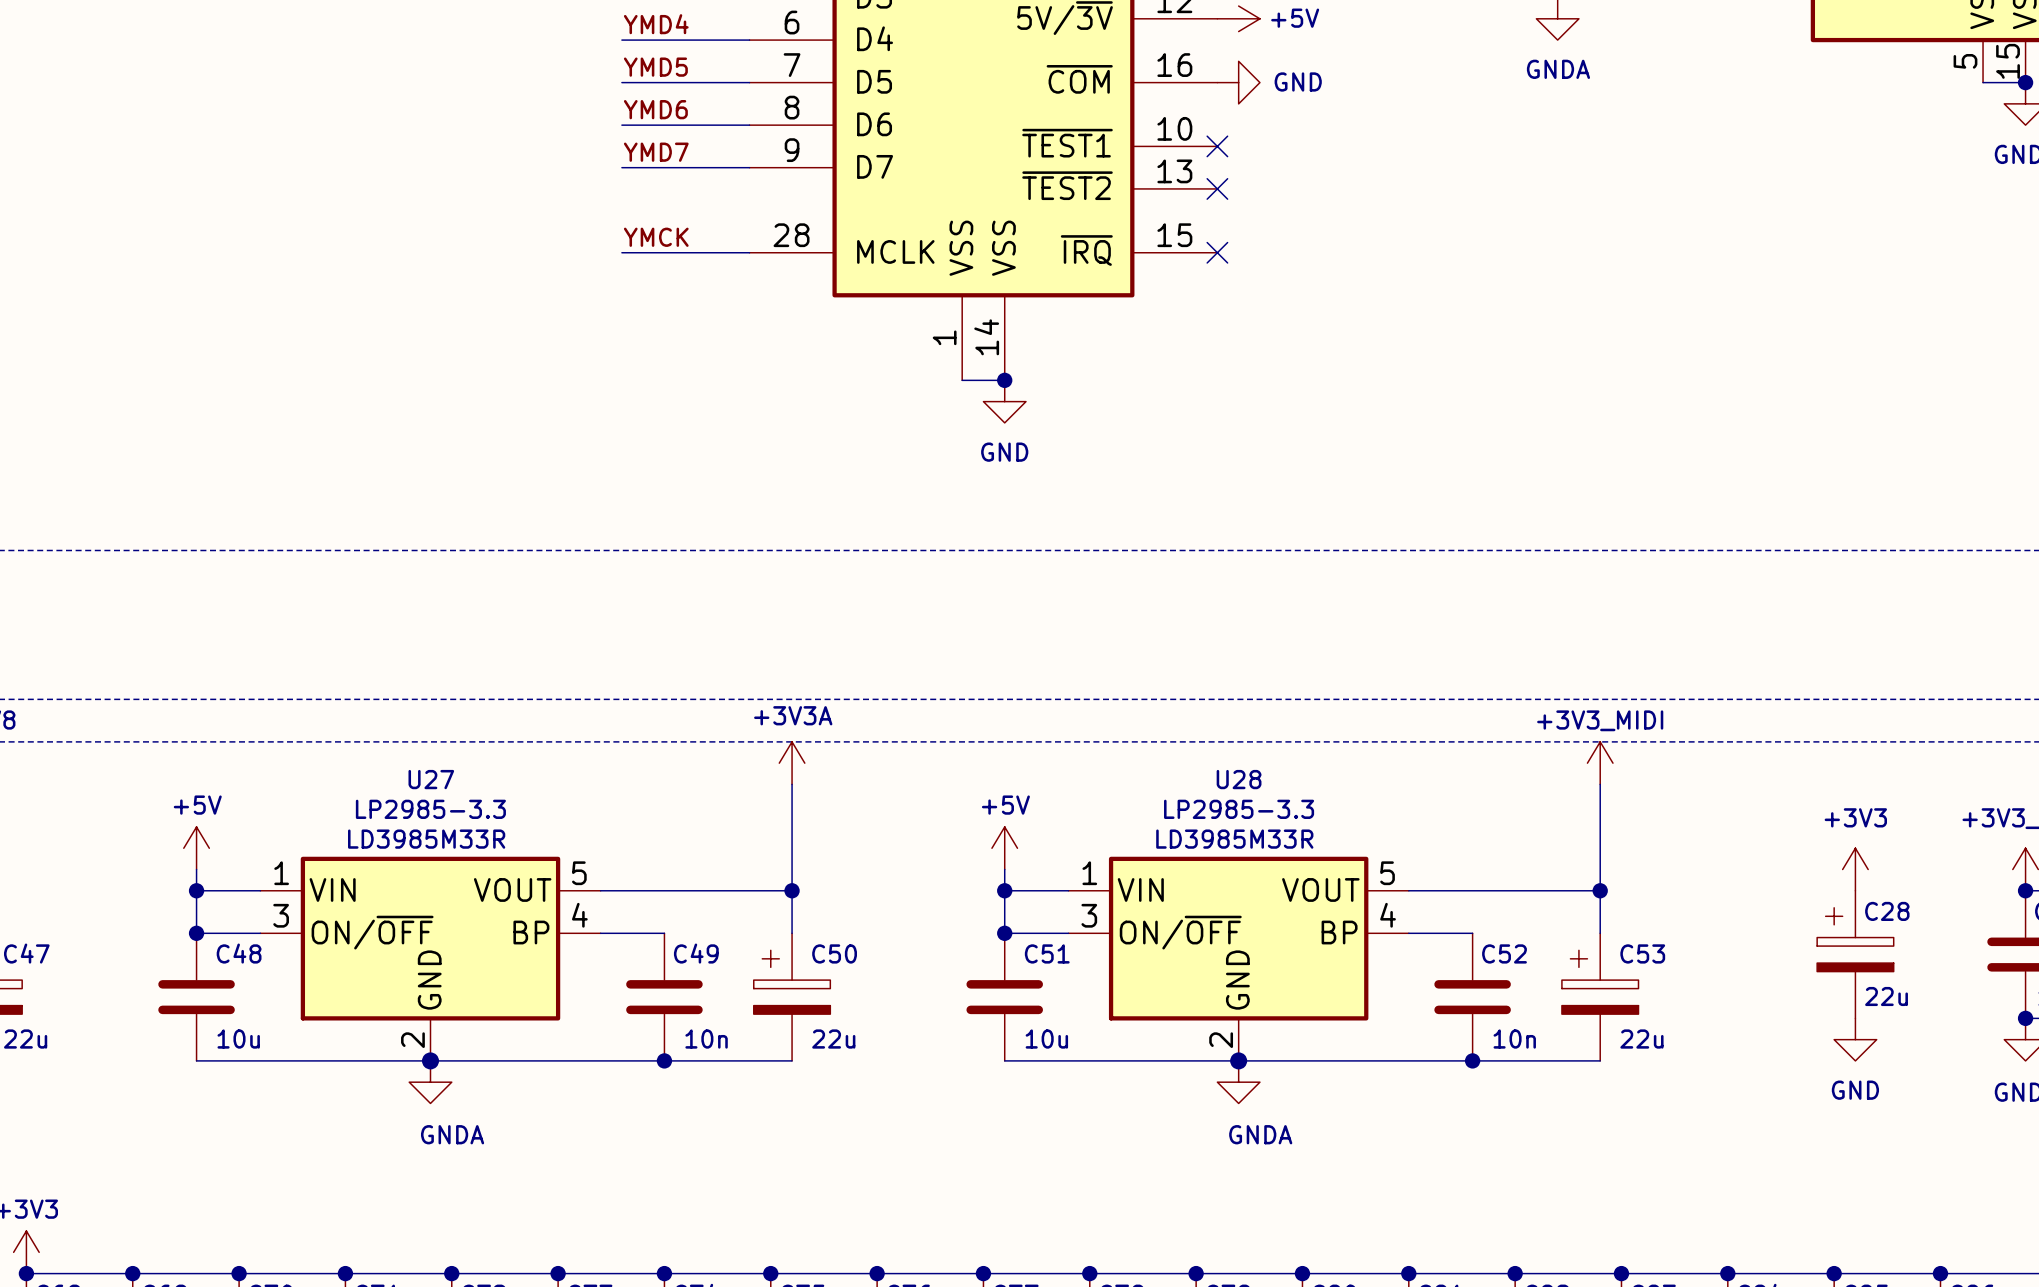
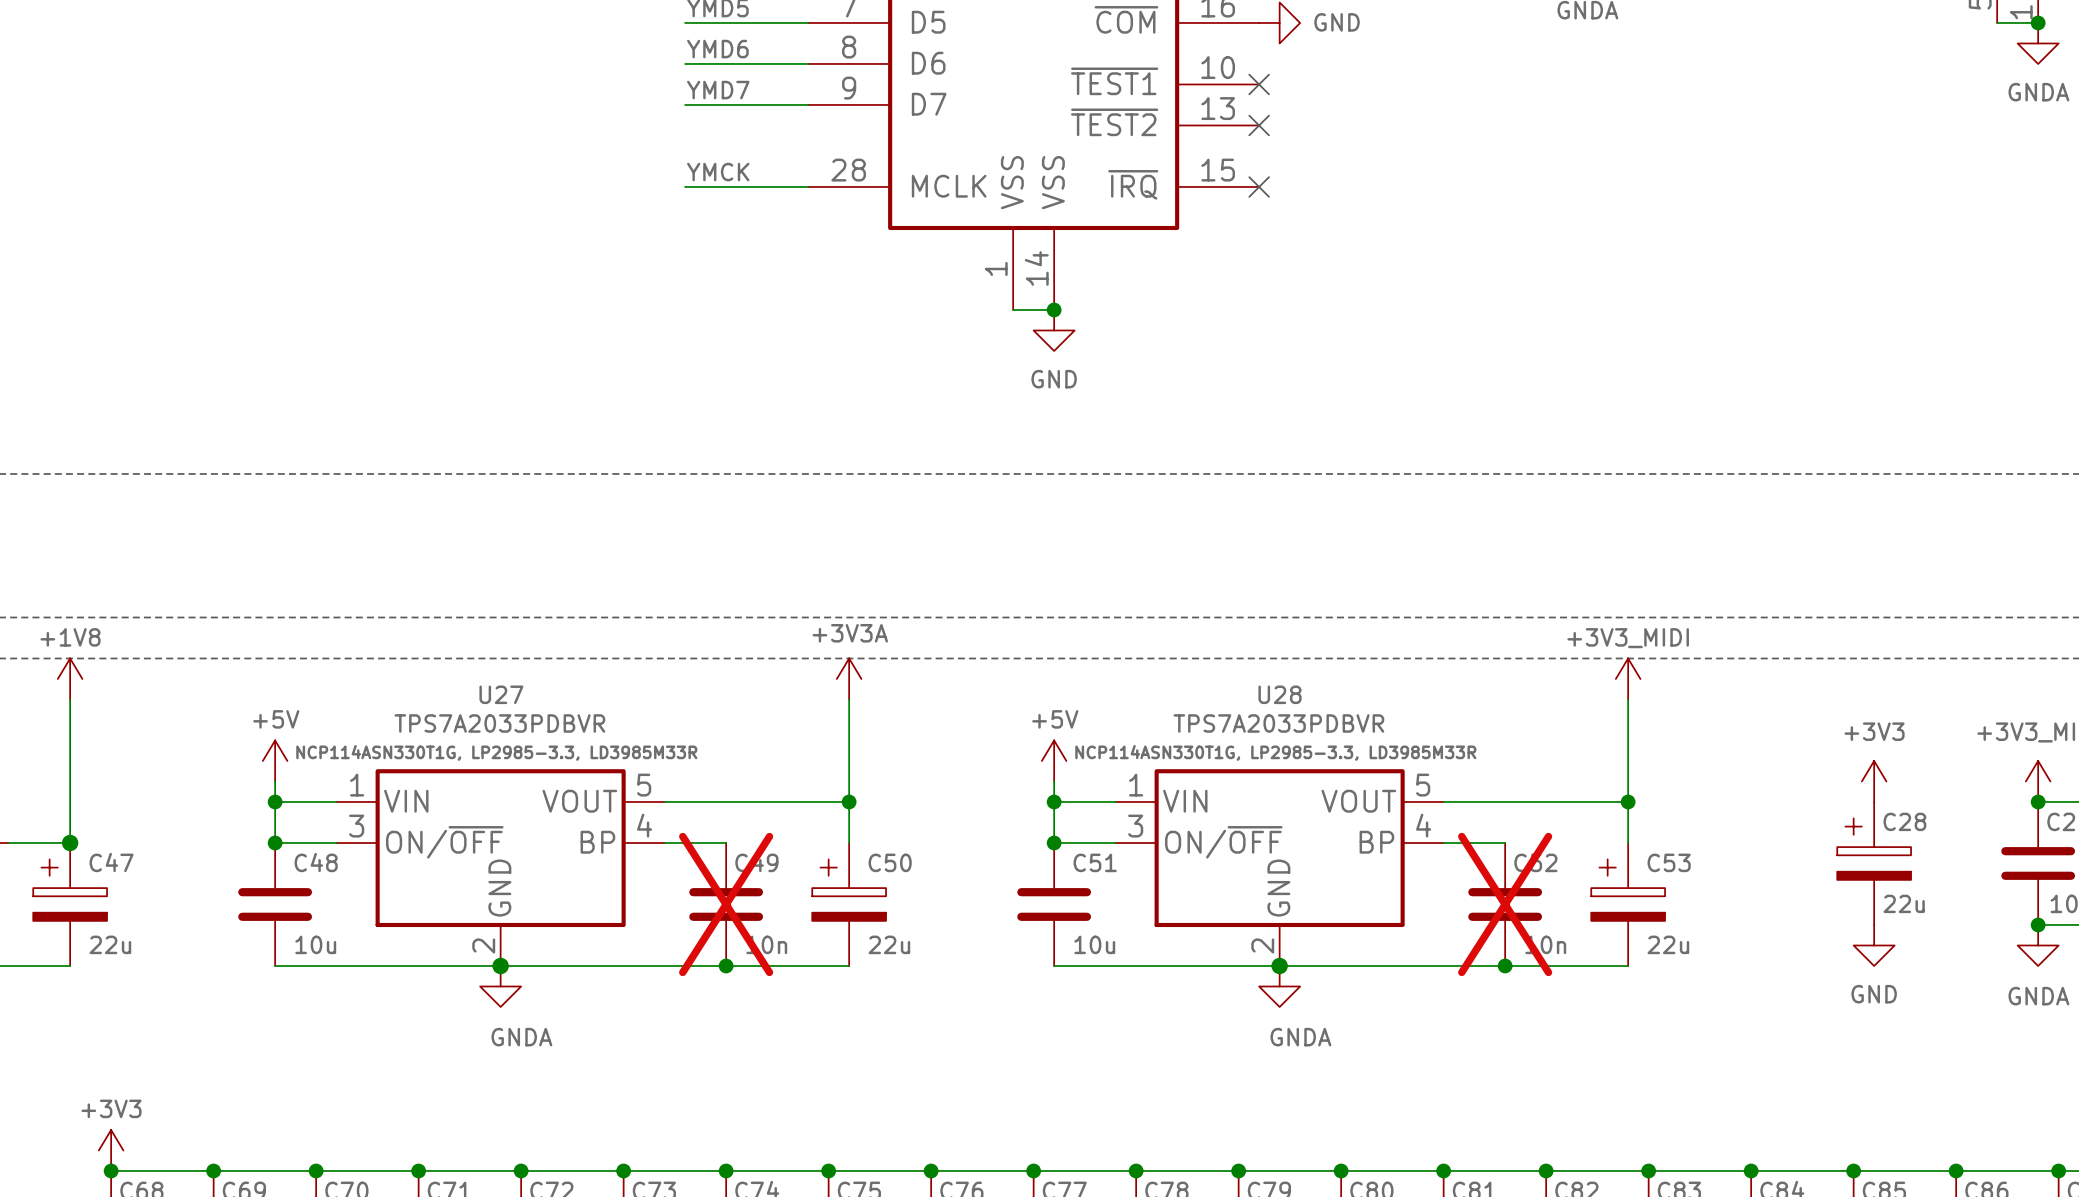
U27 value: LP2985-3.3 (430, 809) -> TPS7A2033PDBVR (499, 723)
U28 value: LP2985-3.3 (1239, 809) -> TPS7A2033PDBVR (1278, 723)
U27 text: LD3985M33R (426, 839) -> NCP114ASN330T1G, LP2985-3.3, LD3985M33R (496, 752)
U28 text: LD3985M33R (1234, 839) -> NCP114ASN330T1G, LP2985-3.3, LD3985M33R (1275, 752)
C49 do-not-place cross: none -> (726, 904)
C52 do-not-place cross: none -> (1505, 904)

